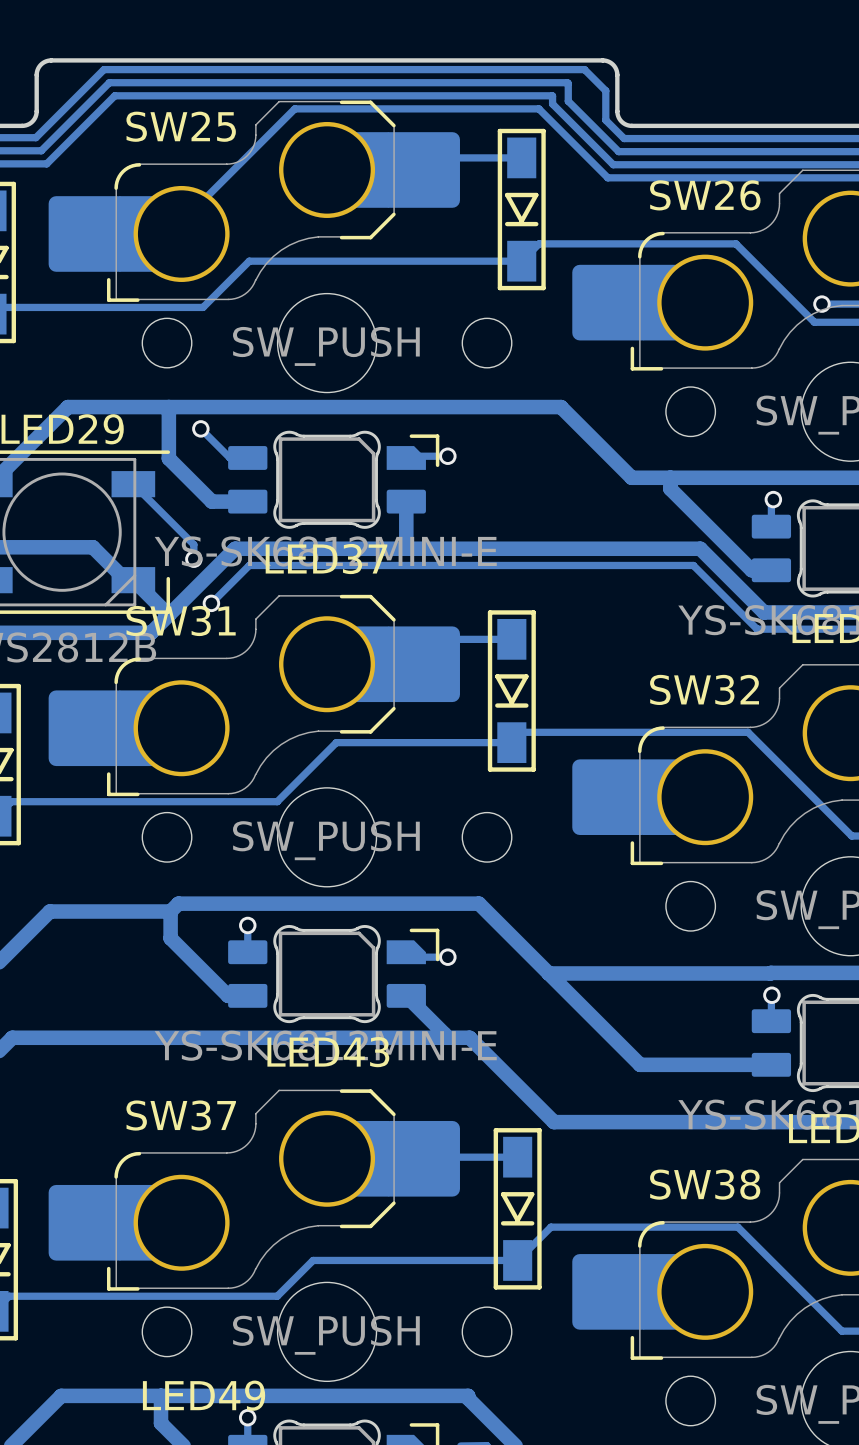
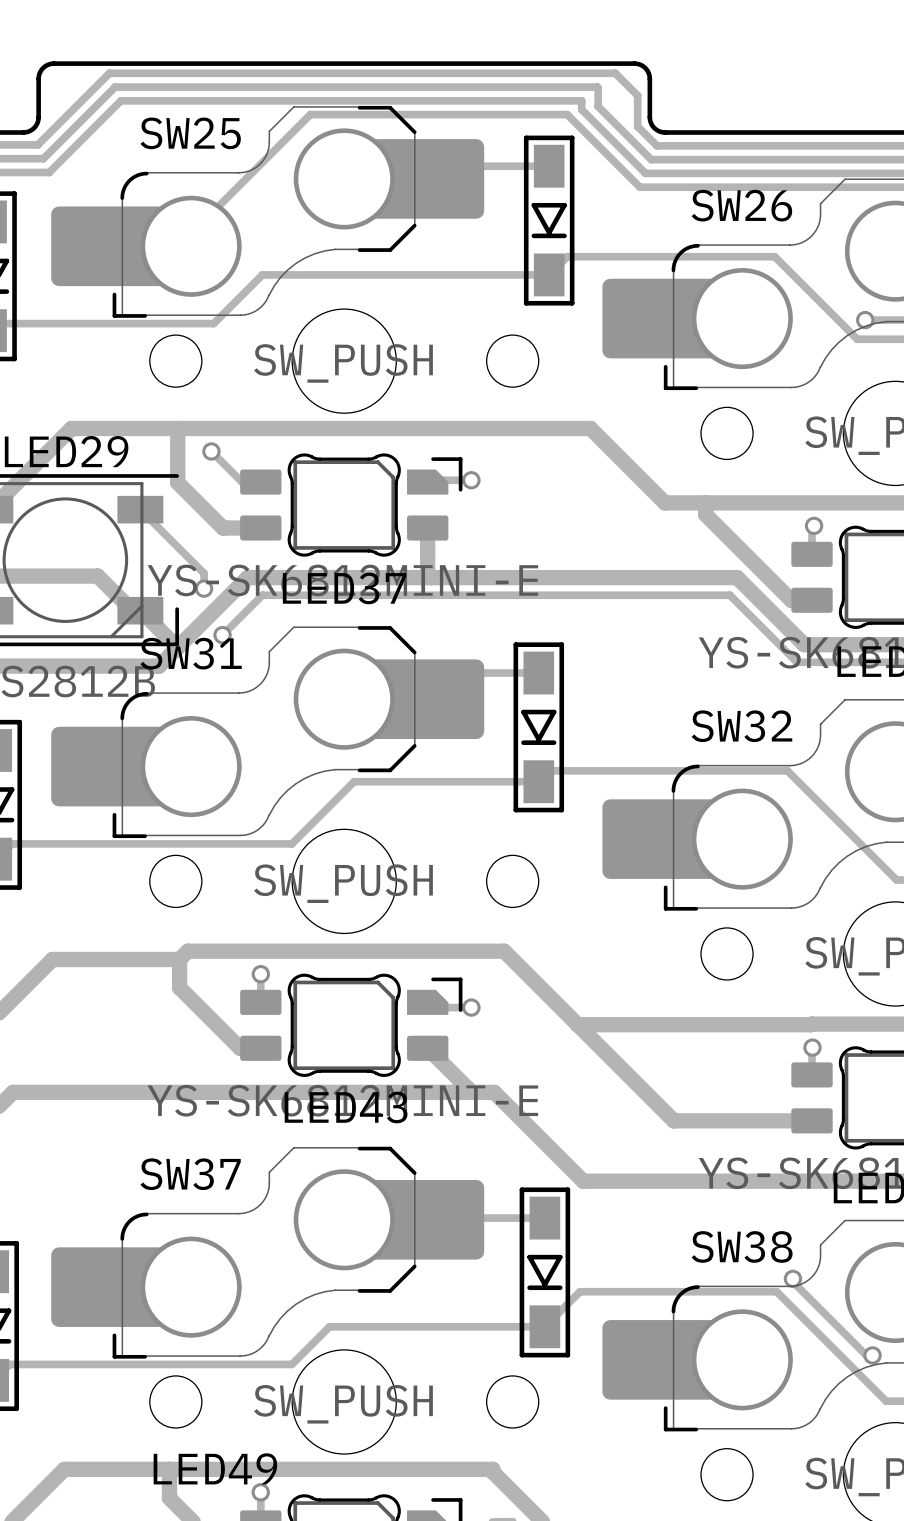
track: none -> (792, 1278) (792, 1281) (866, 1355) (872, 1355)
via: none -> (792, 1278)
via: none -> (872, 1355)

